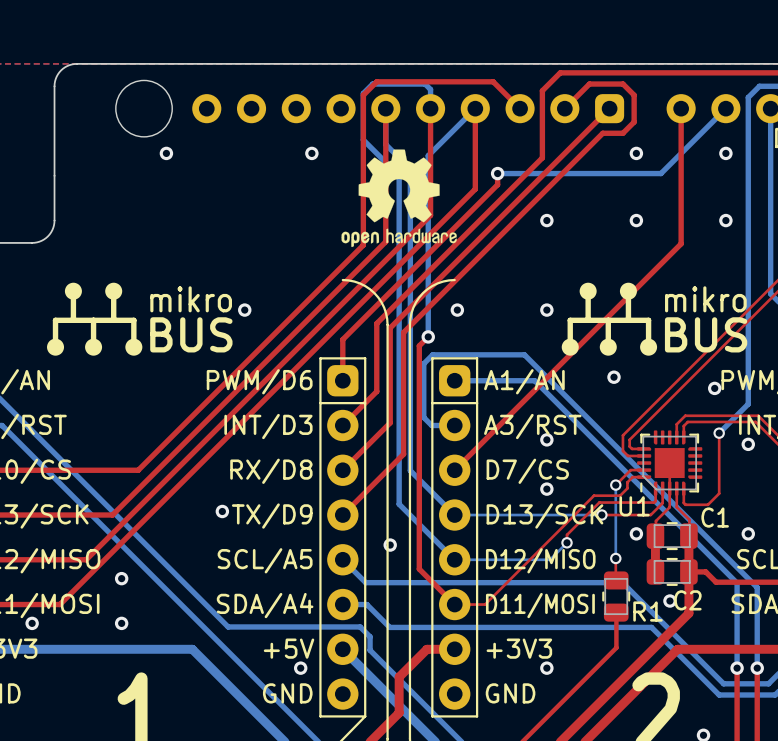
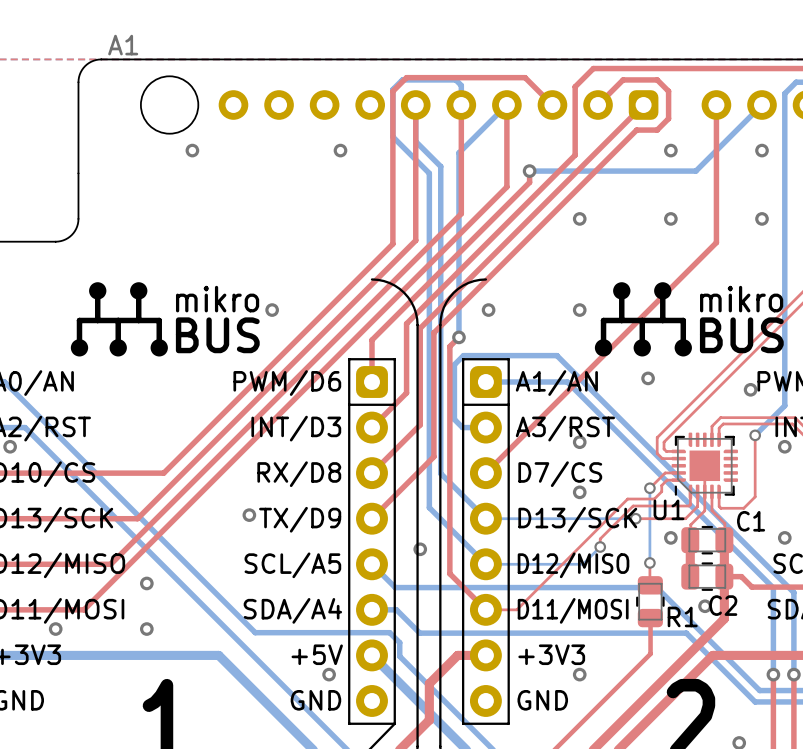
A1 name: none -> A1 (123, 45)
drawing: [341, 149, 457, 248] -> none

